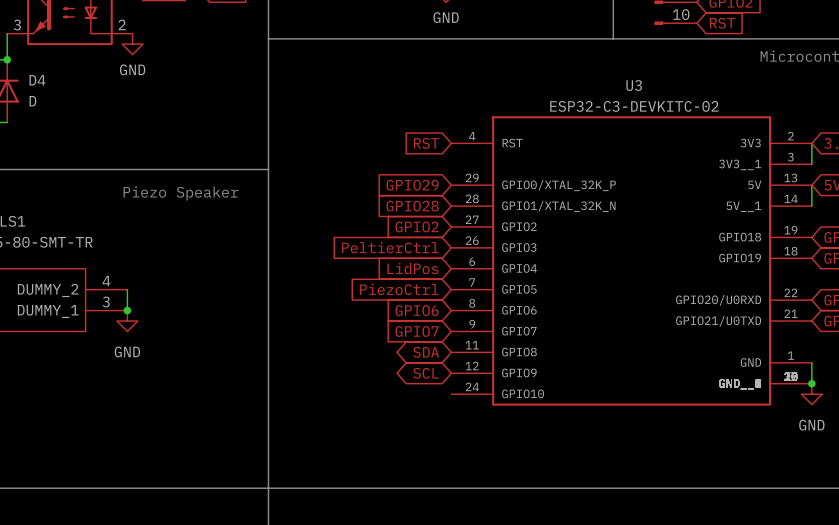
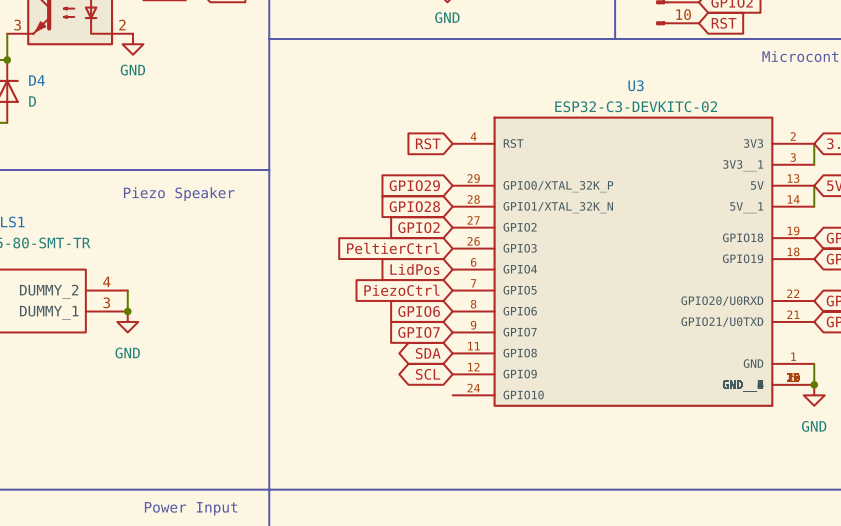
text: none -> Power Input (191, 508)

